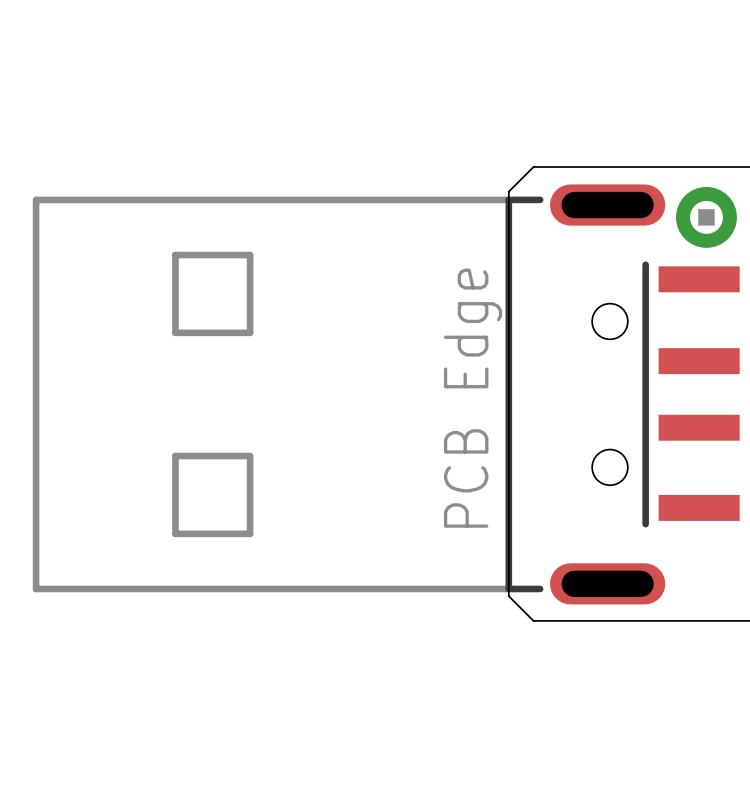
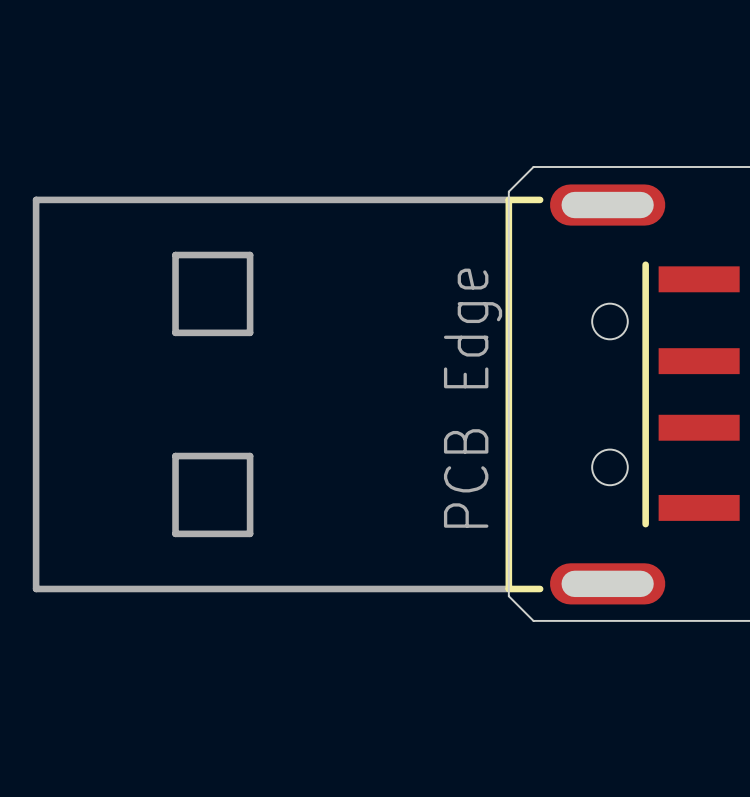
part: (706, 217) -> none

